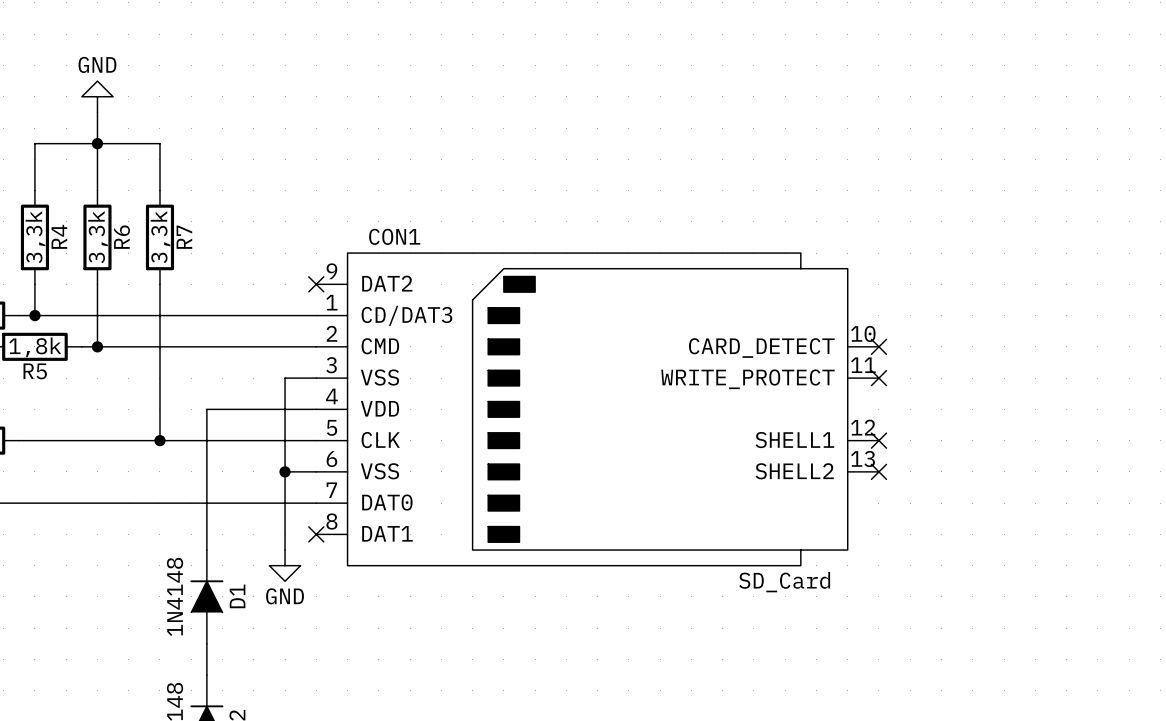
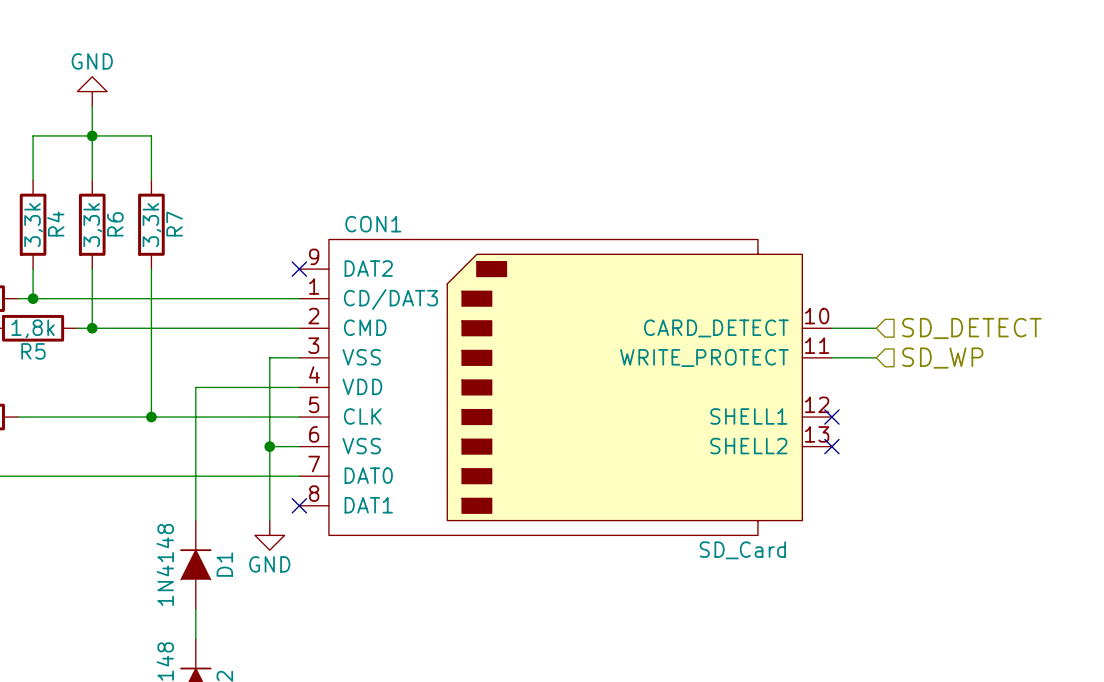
wire: none -> (831, 328) (876, 328)
no-connect mark: (878, 346) -> none
hierarchical label: none -> SD_DETECT (971, 328)
wire: none -> (831, 357) (876, 357)
no-connect mark: (878, 378) -> none
hierarchical label: none -> SD_WP (942, 358)

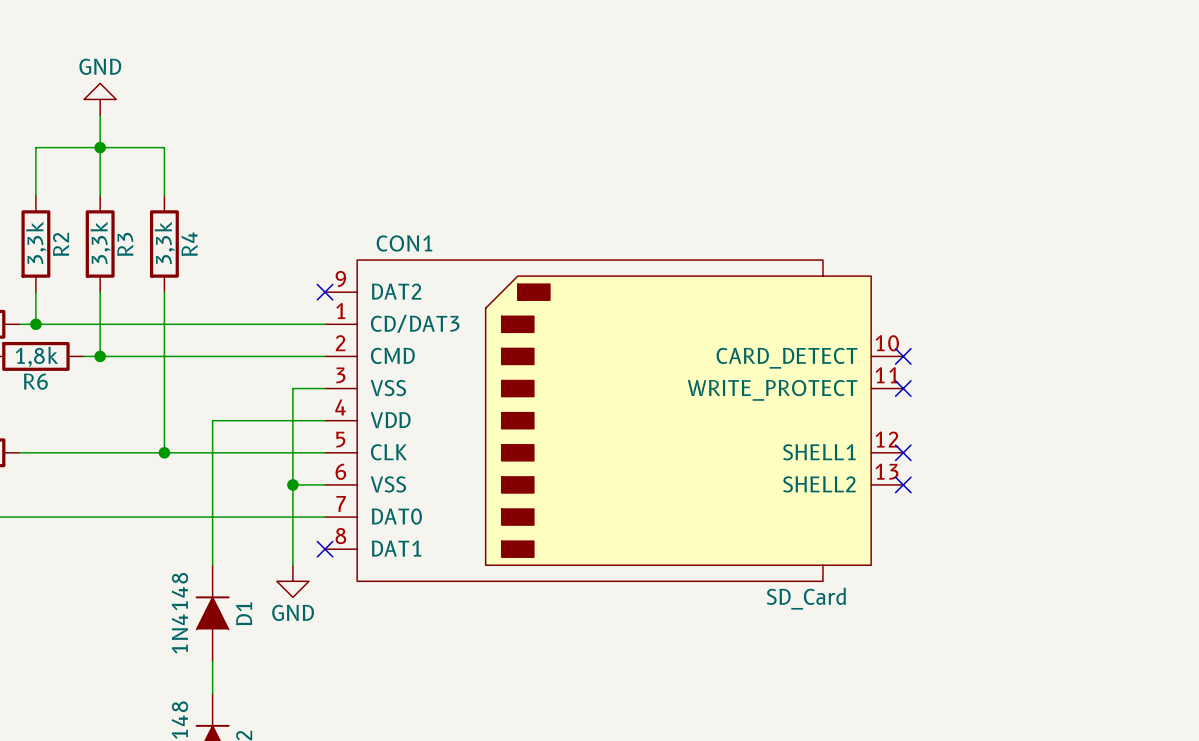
R4 name: R4 (55, 224) -> R2 (61, 244)
R6 name: R6 (115, 224) -> R3 (125, 244)
R7 name: R7 (174, 224) -> R4 (189, 244)
wire: (831, 328) (876, 328) -> none
no-connect mark: none -> (903, 356)
hierarchical label: SD_DETECT (971, 328) -> none
R5 name: R5 (33, 351) -> R6 (35, 381)
wire: (831, 357) (876, 357) -> none
no-connect mark: none -> (903, 388)
hierarchical label: SD_WP (942, 358) -> none

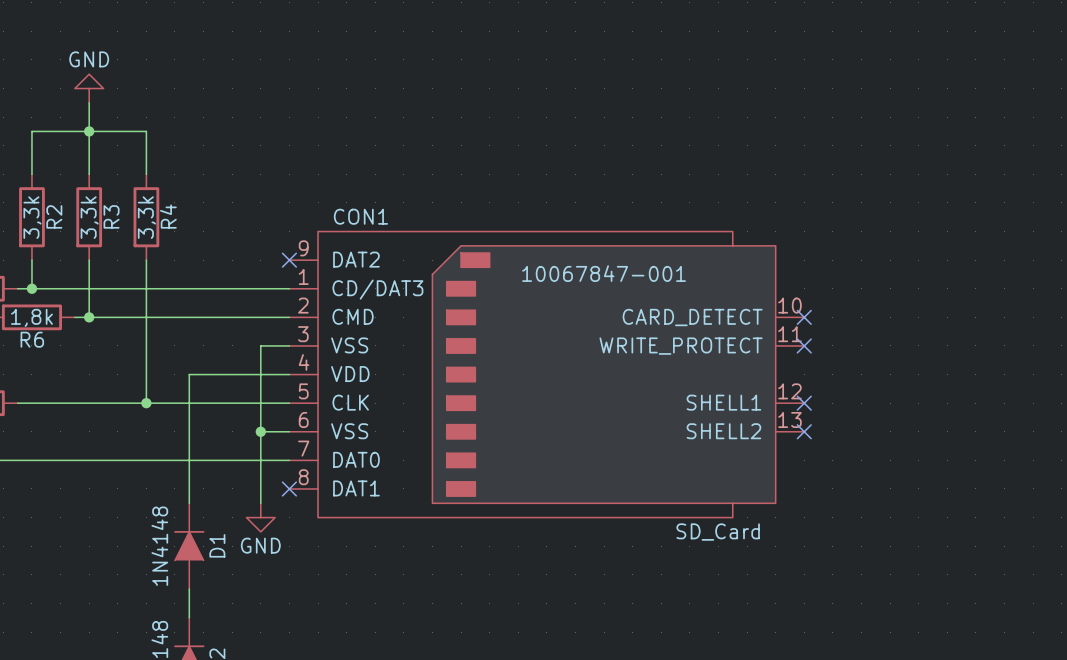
CON1 text: none -> 10067847-001 (604, 273)

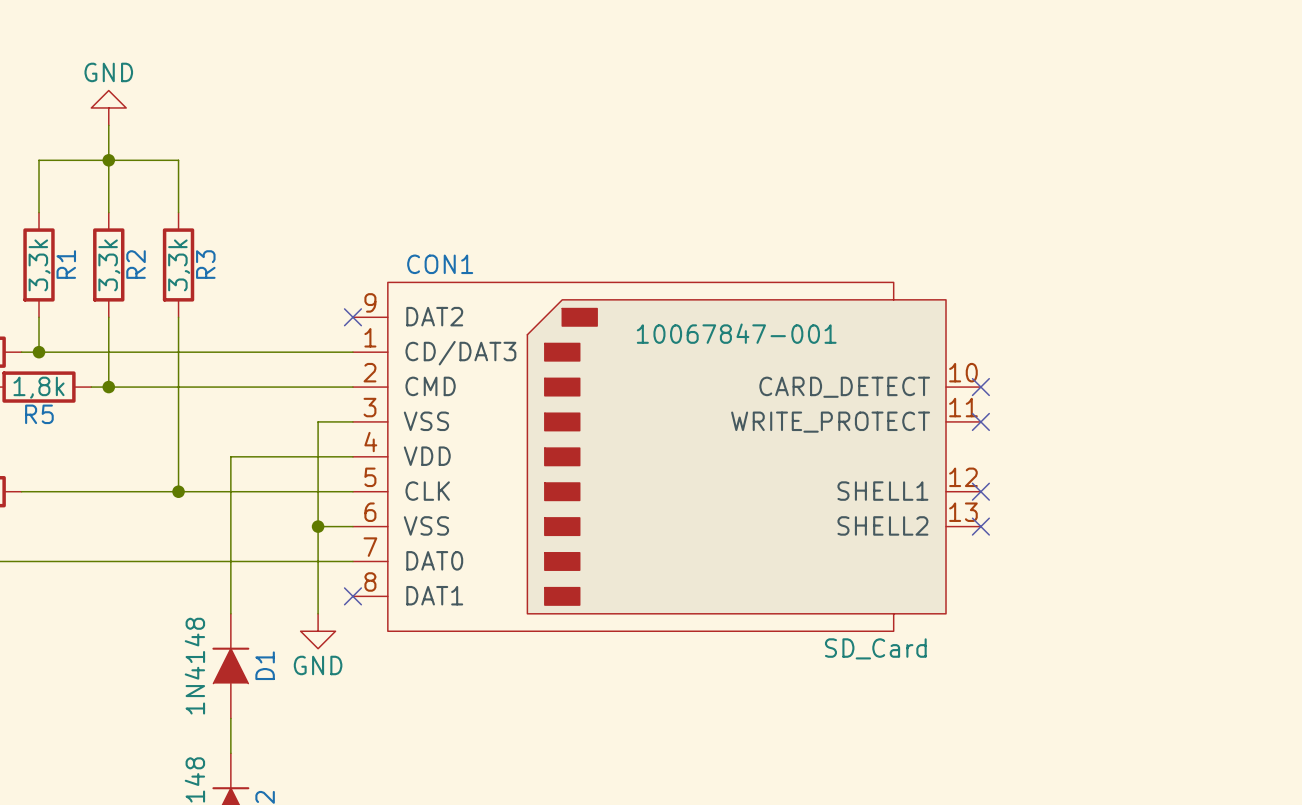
R2 name: R2 (54, 216) -> R1 (66, 264)
R3 name: R3 (111, 216) -> R2 (136, 264)
R4 name: R4 (168, 216) -> R3 (205, 264)
R6 name: R6 (32, 339) -> R5 (39, 414)

